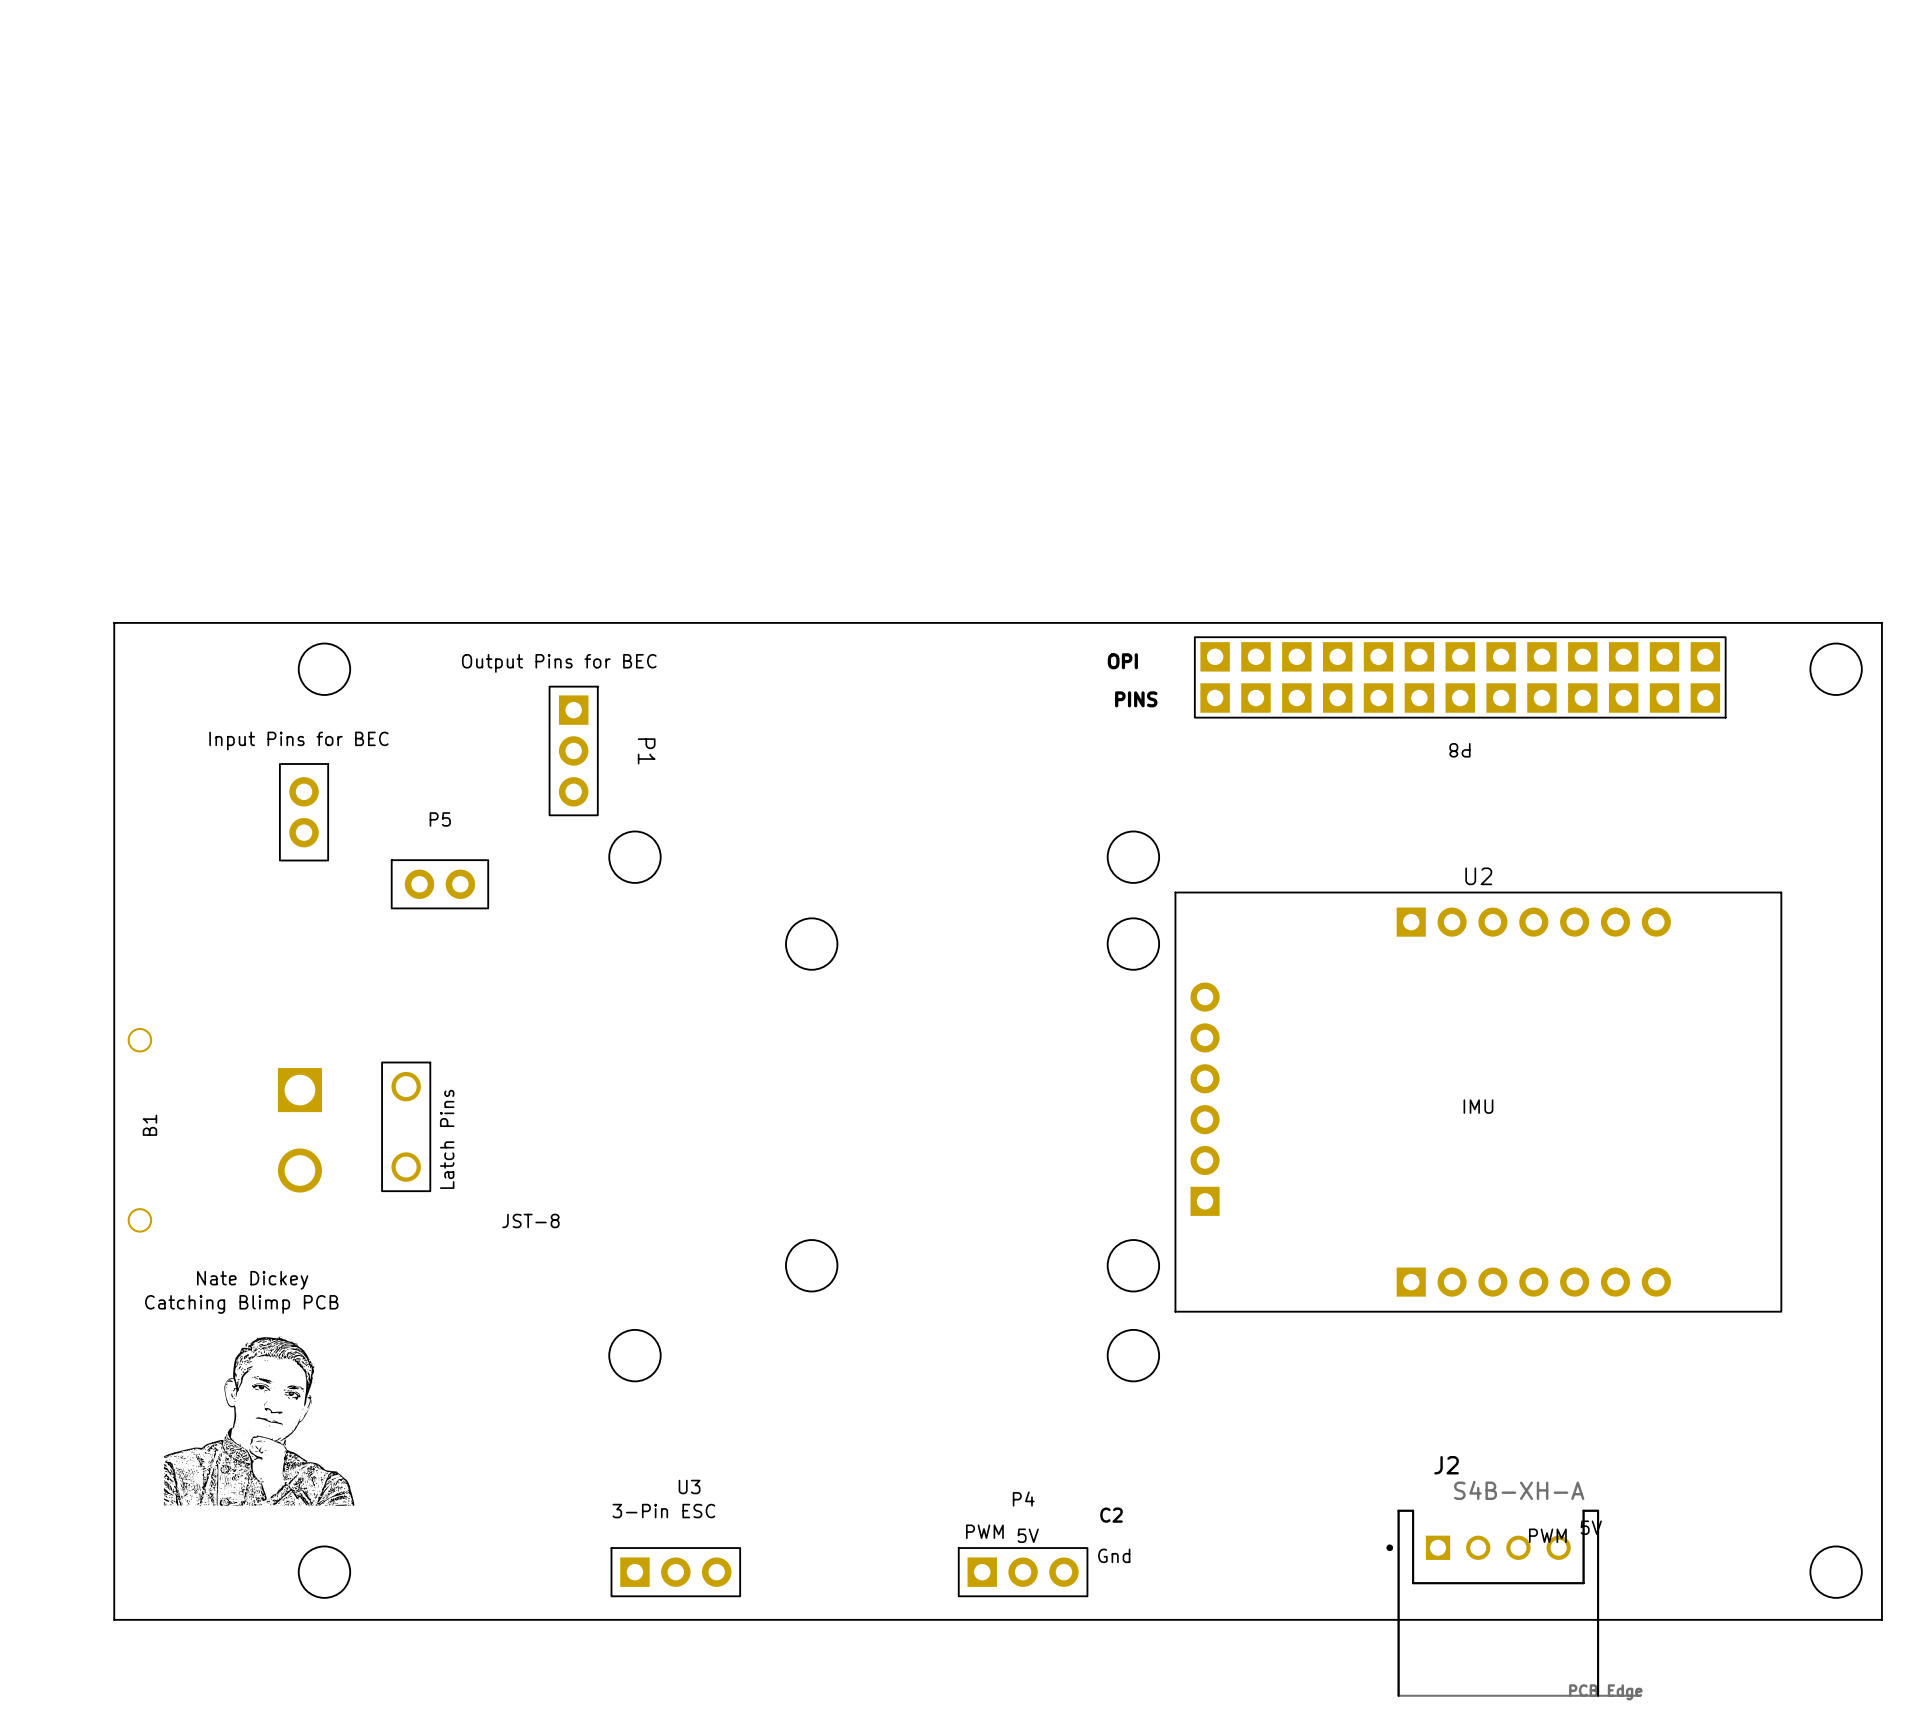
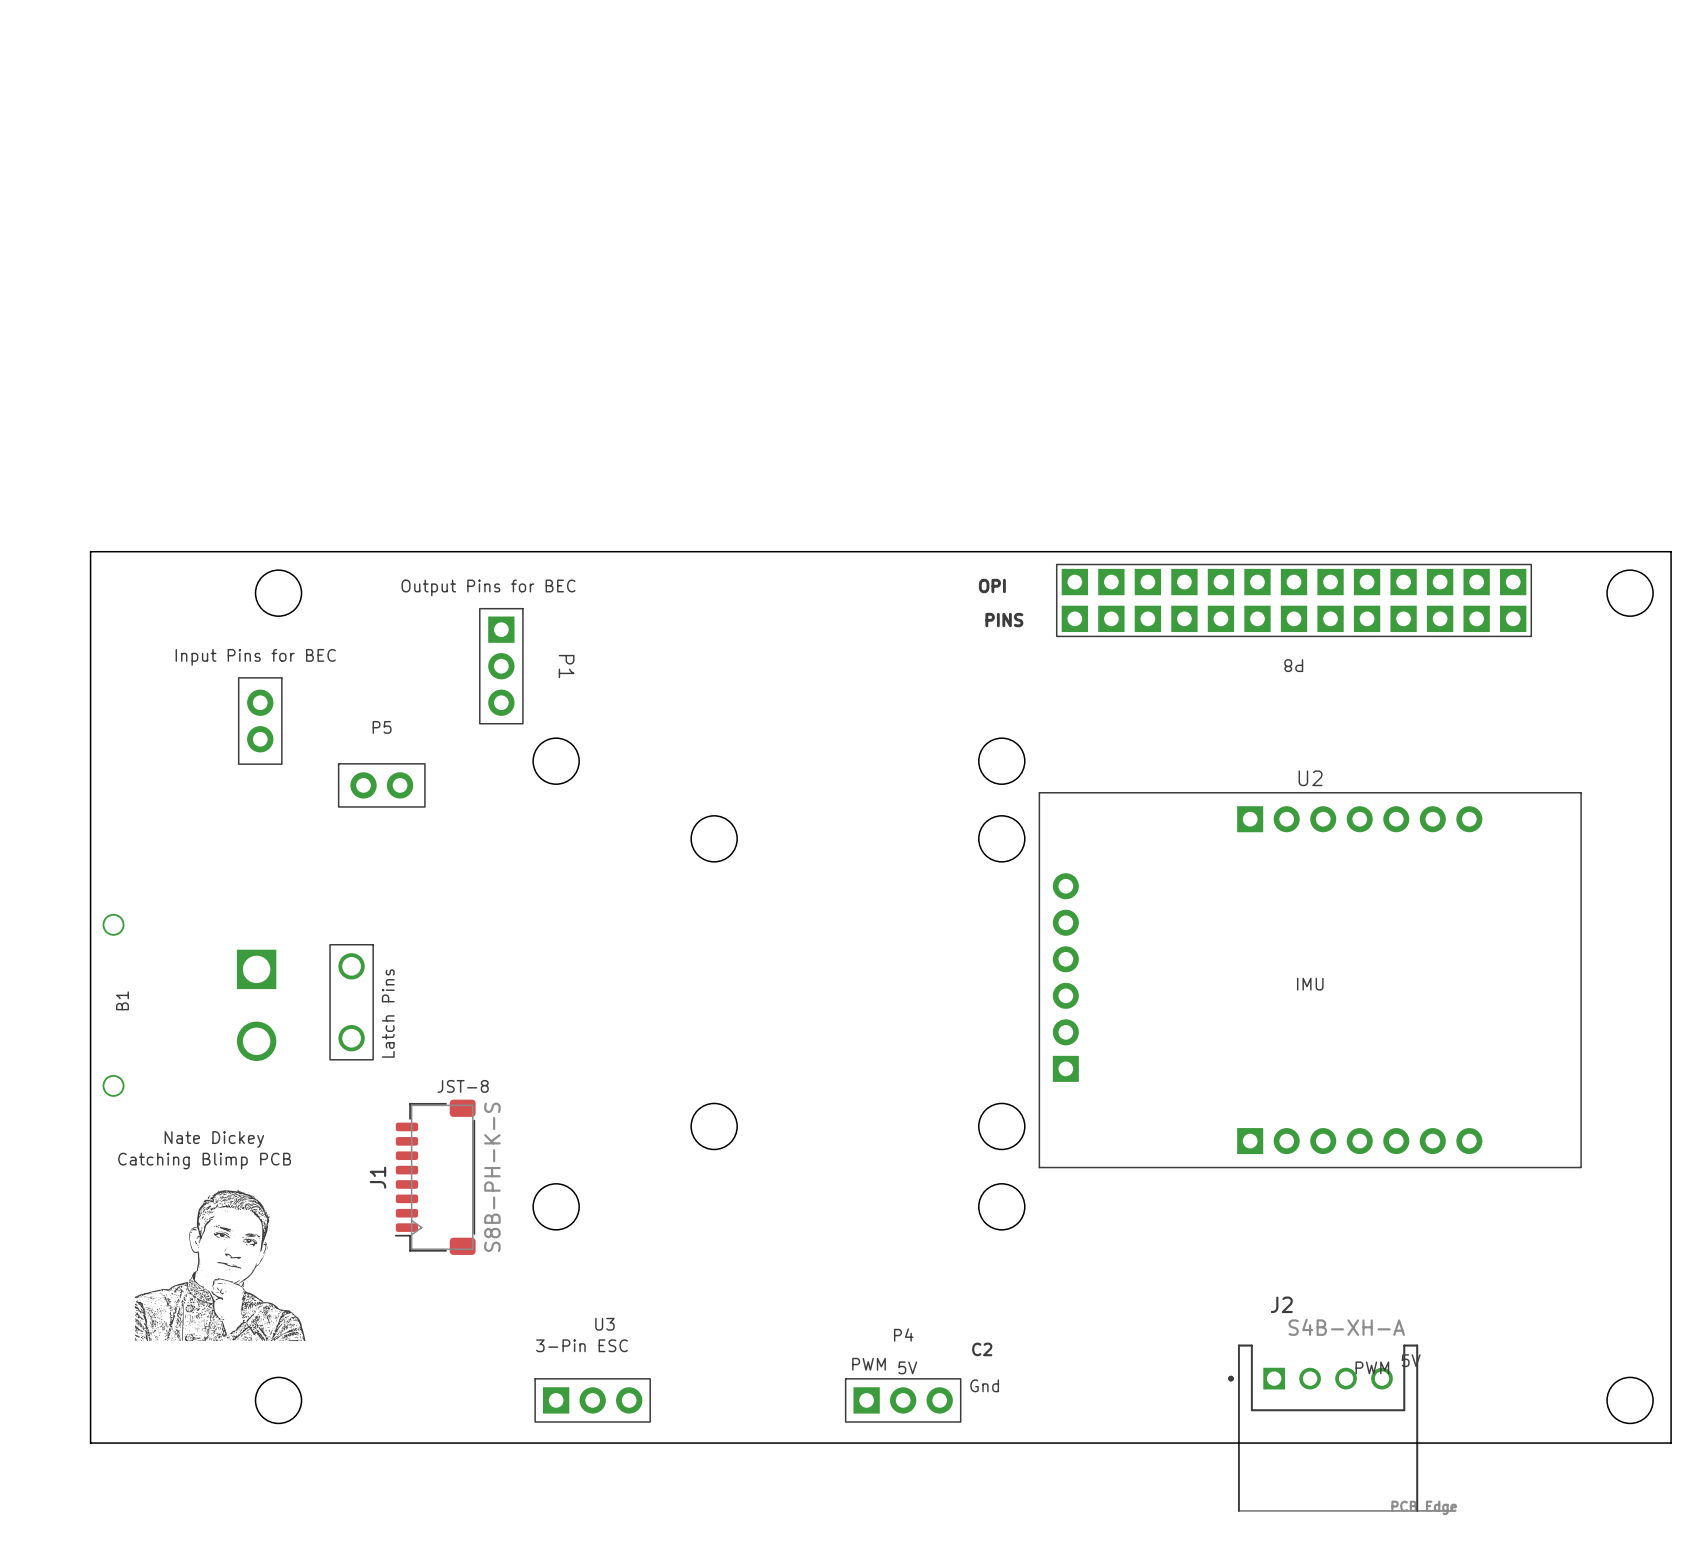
J1: none -> S8B-PH-K-S (435, 1177)

